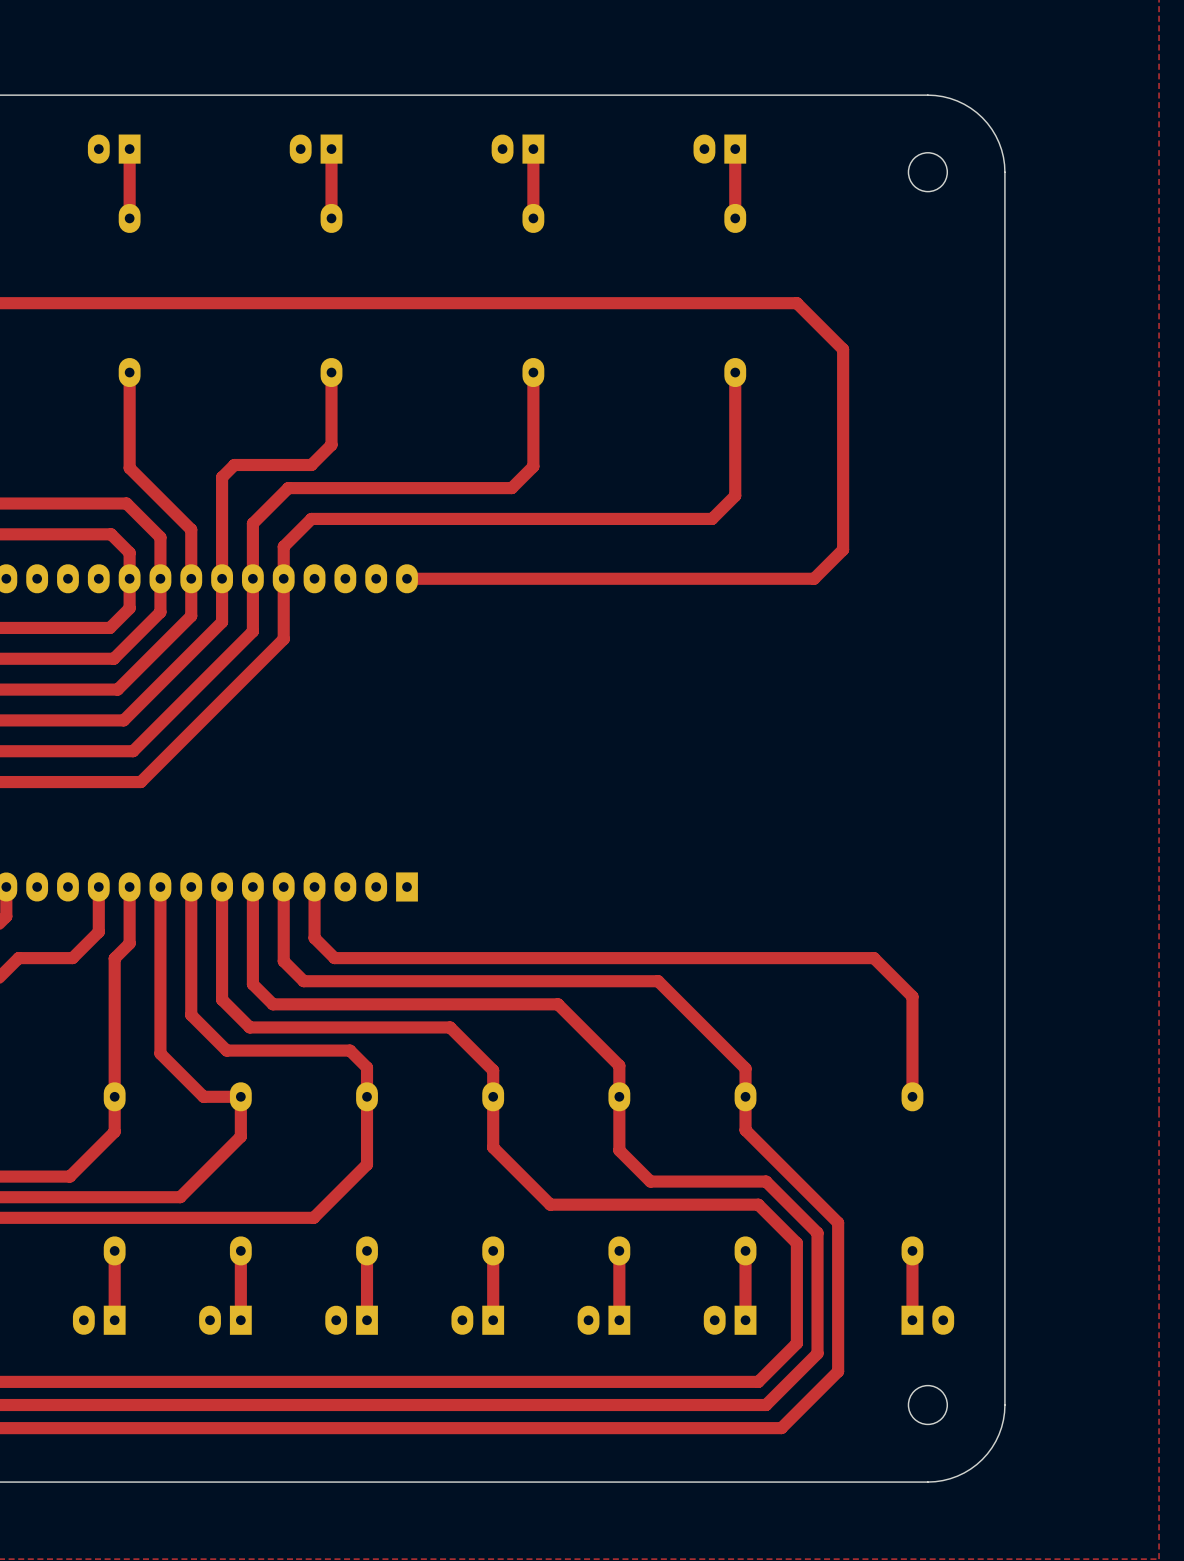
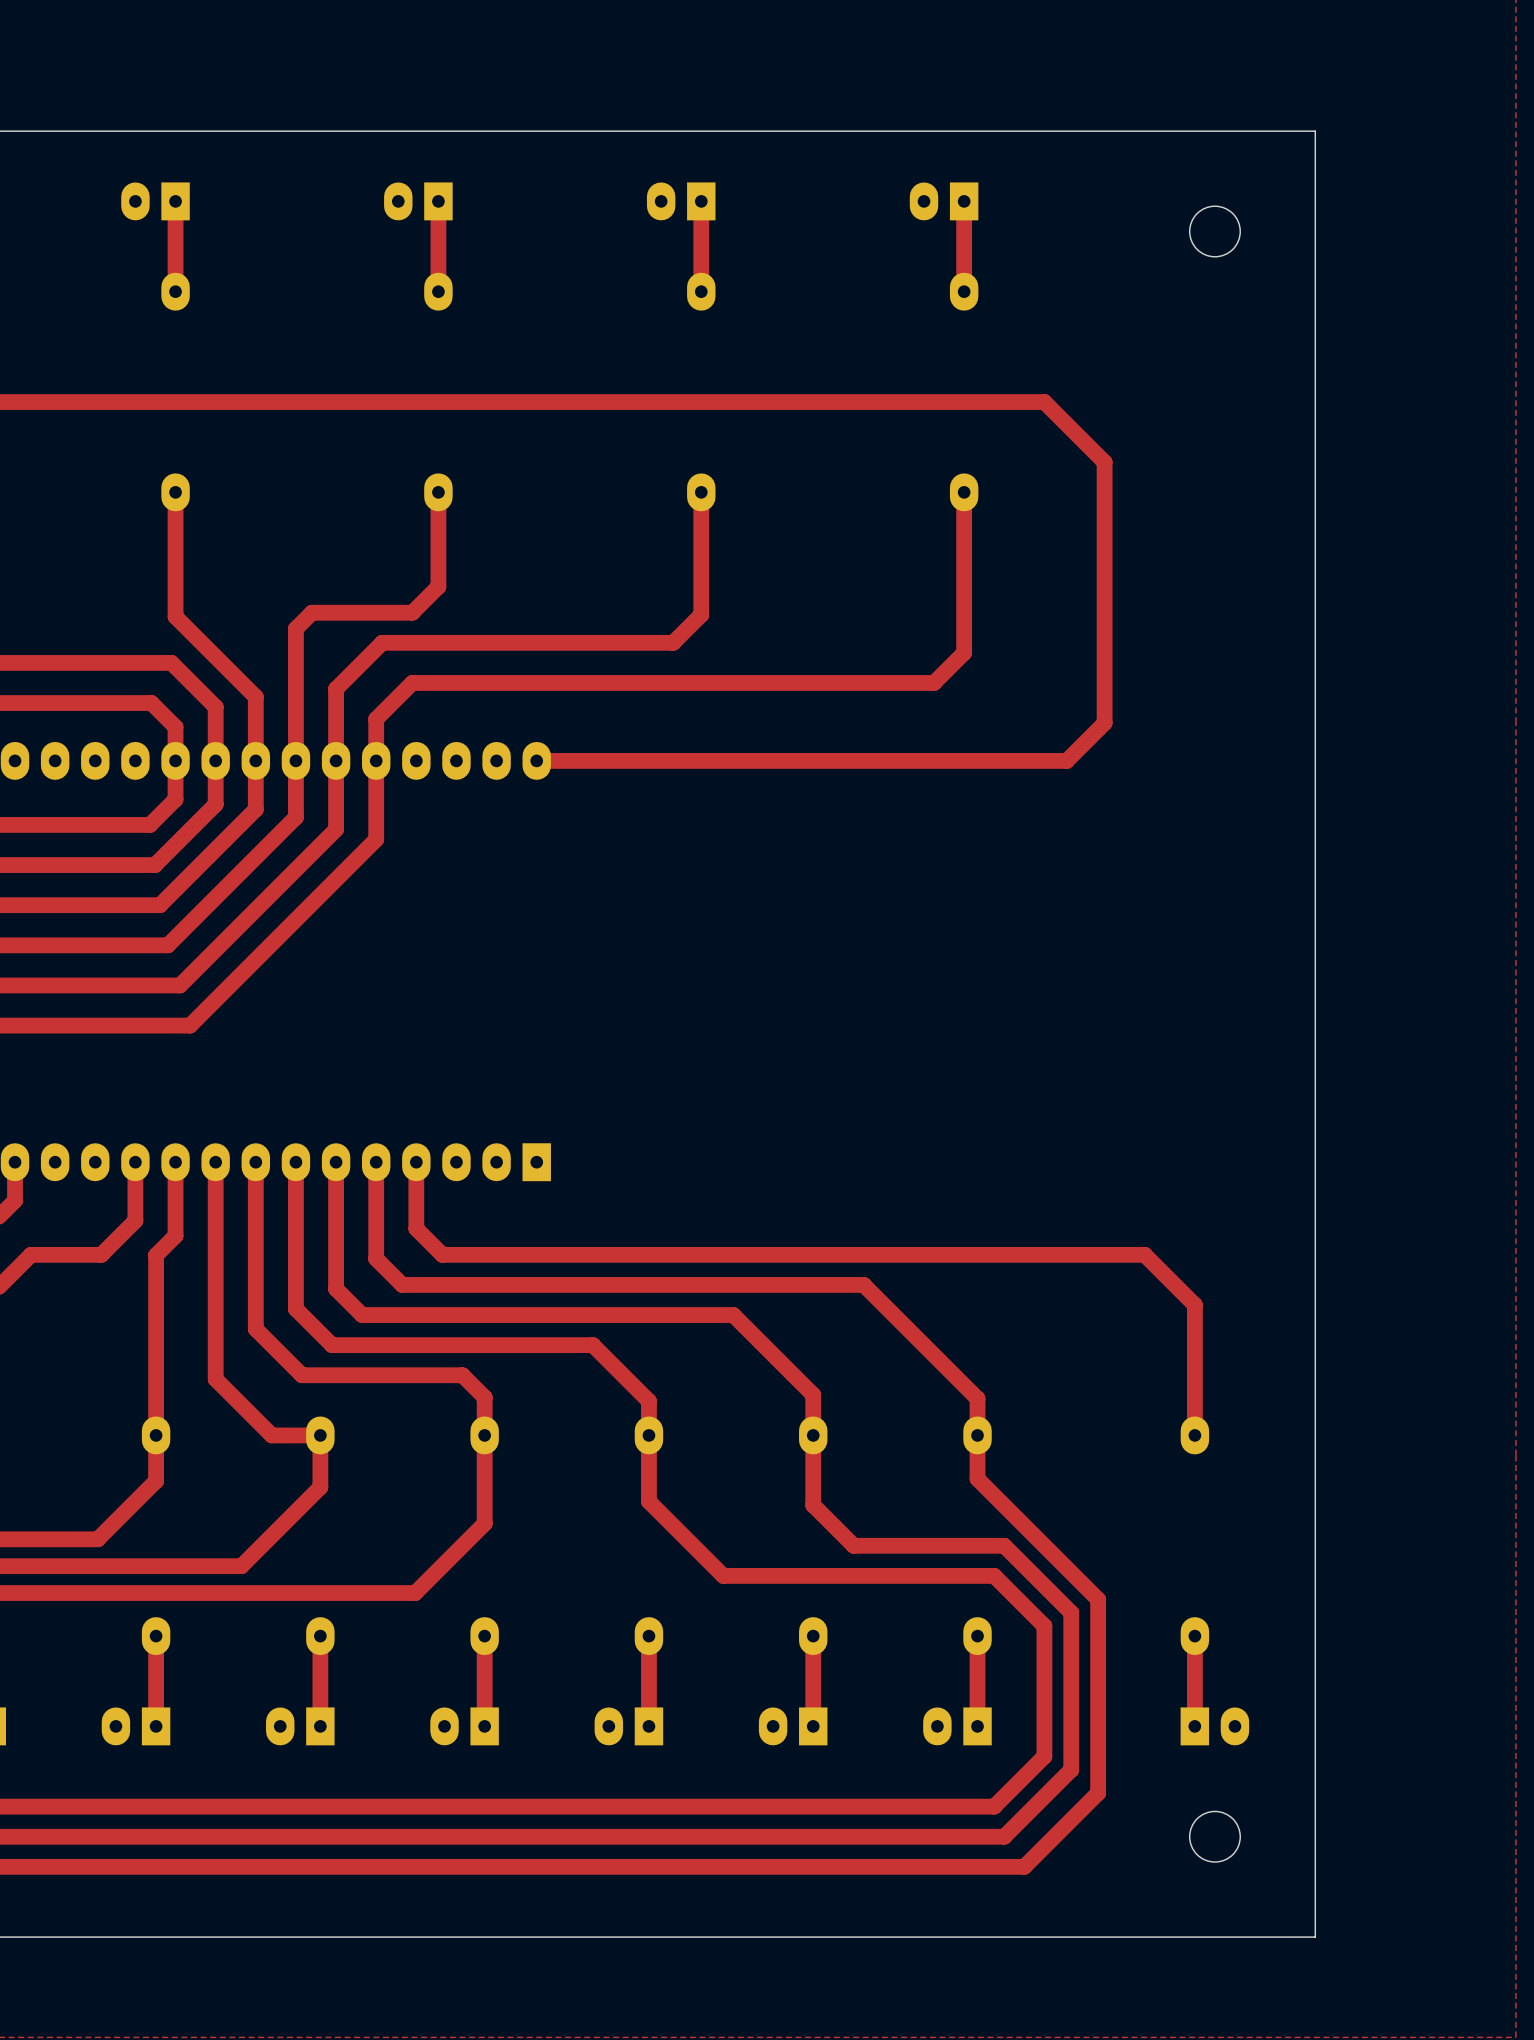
board edge: (927, 95) (957, 101) (982, 117) (999, 142) (1004, 172) -> (1214, 131) (1315, 131) (1315, 231)
board edge: (1004, 1405) (999, 1434) (982, 1459) (957, 1476) (927, 1482) -> (1315, 1836) (1315, 1937) (1214, 1937)

